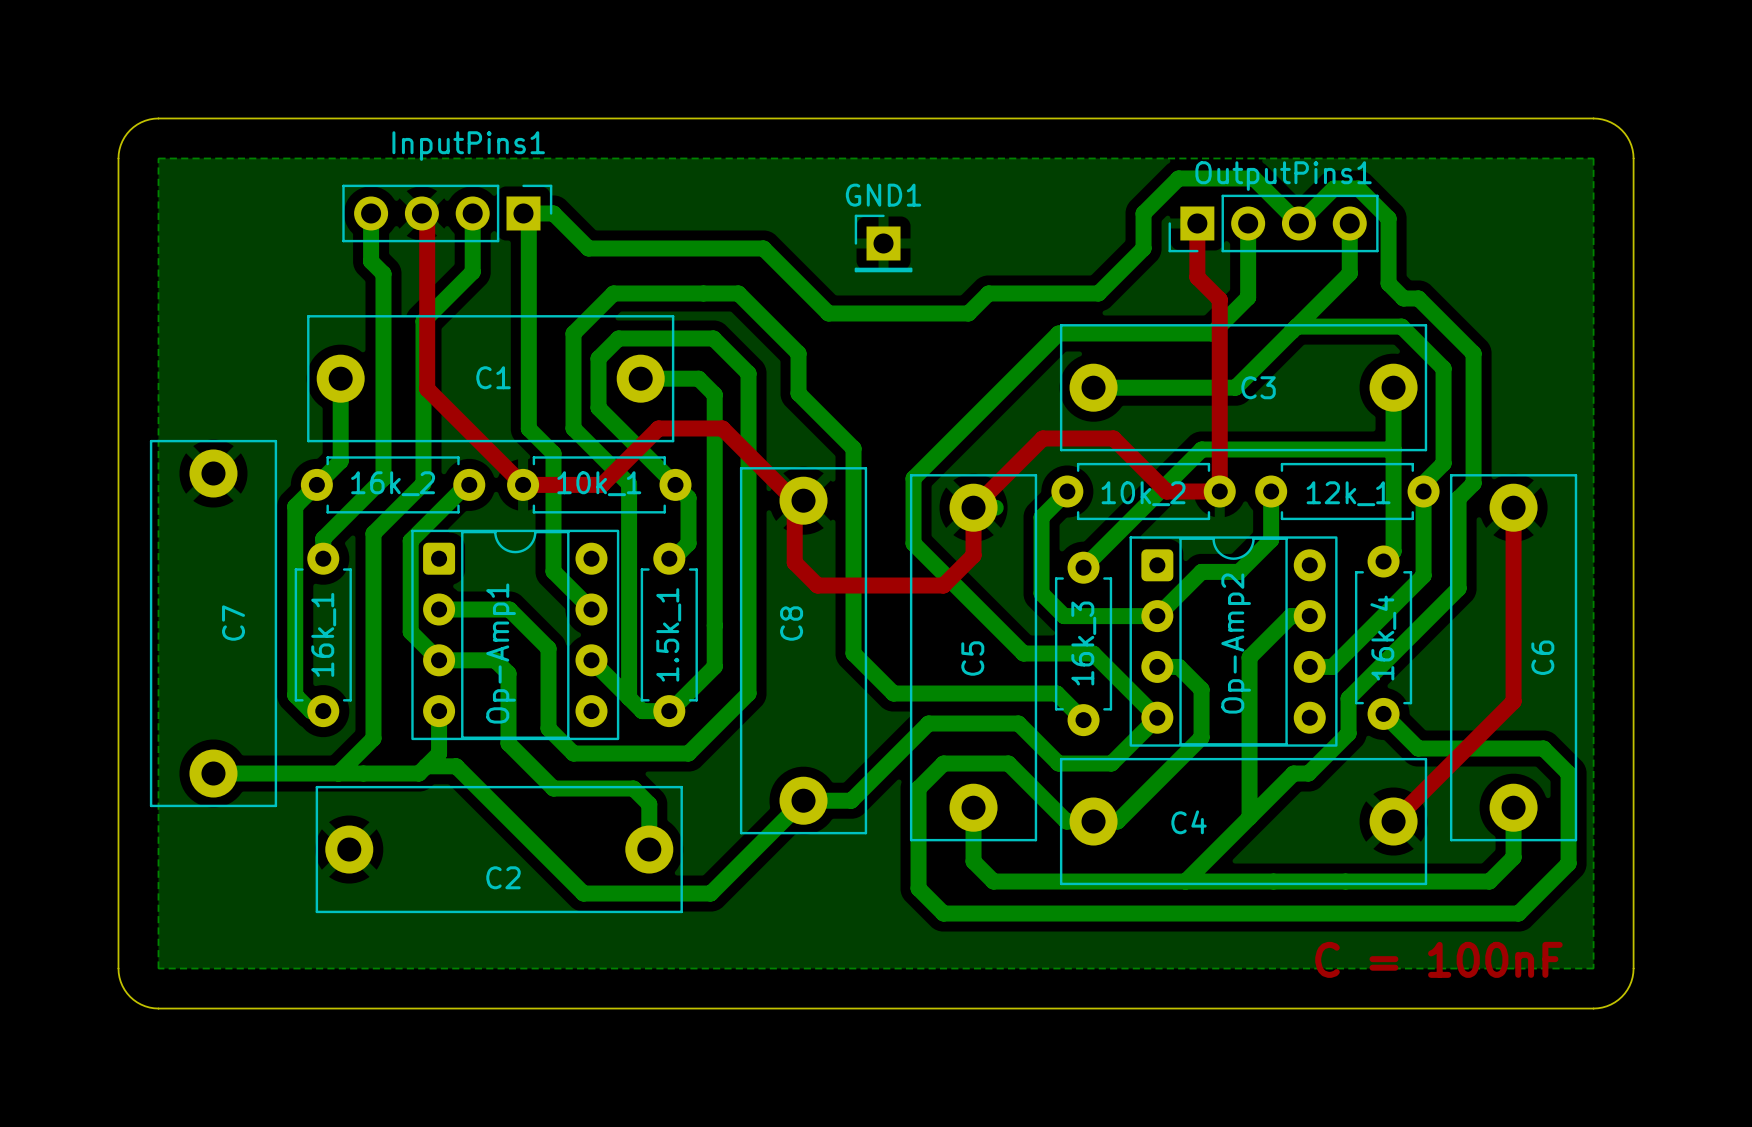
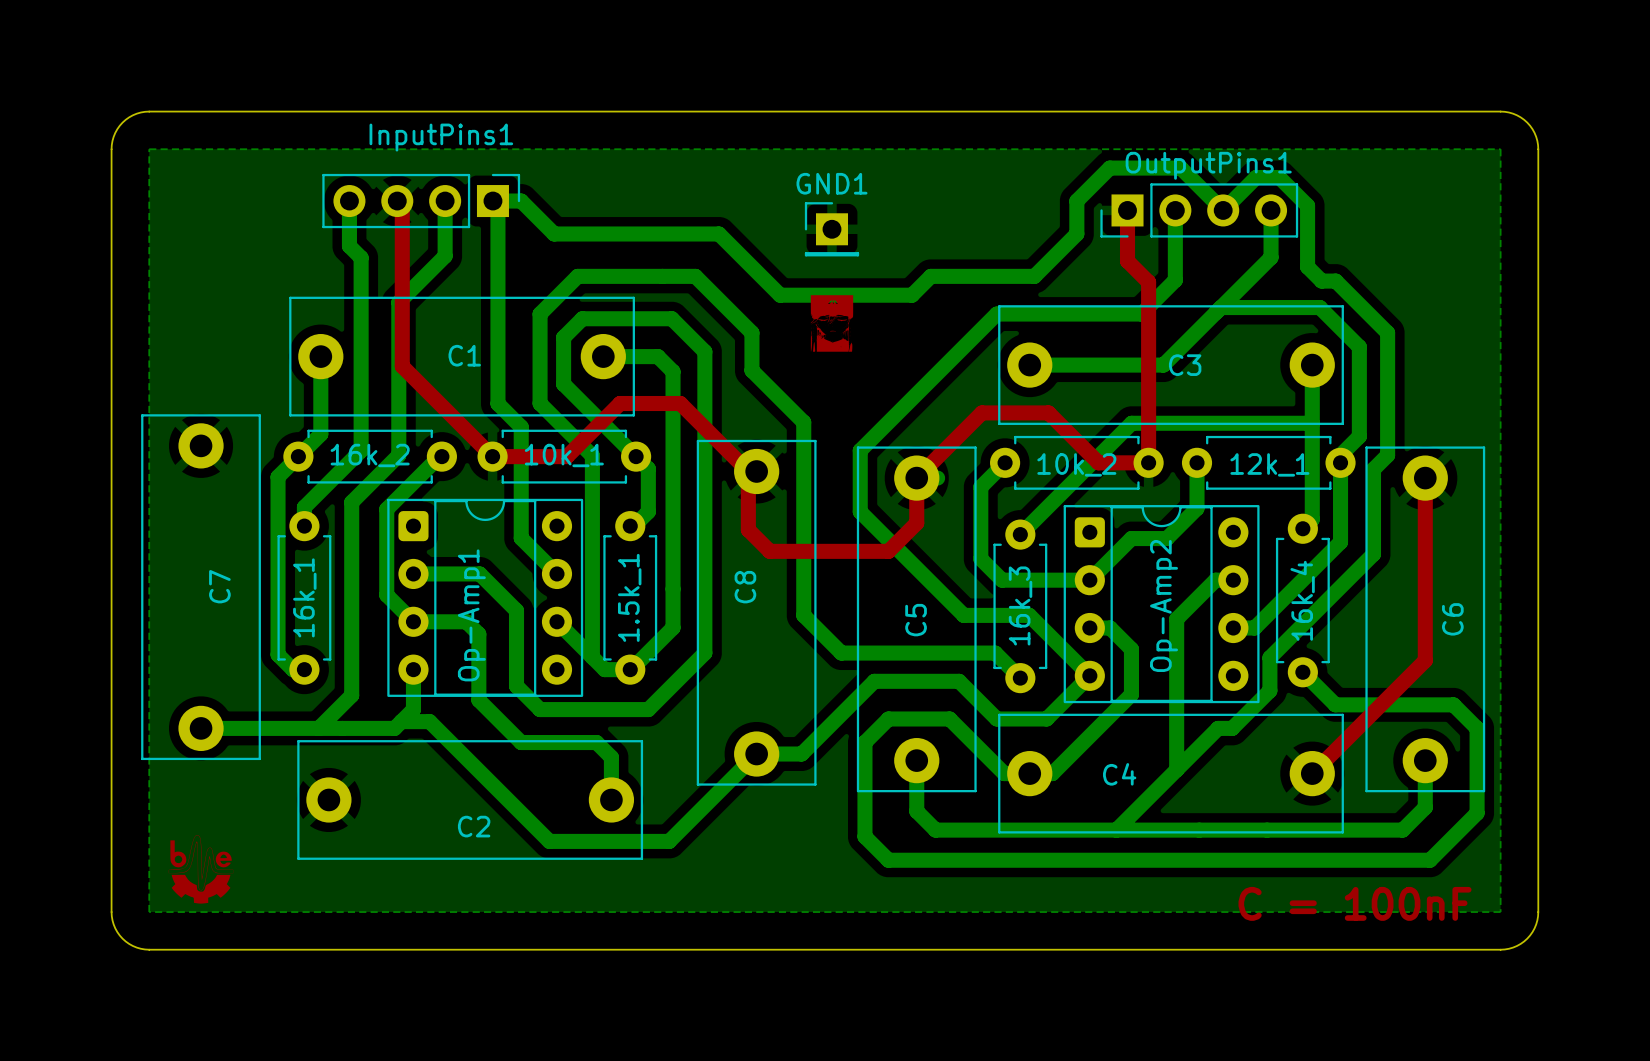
drawing: none -> [810, 295, 854, 352]
drawing: none -> [168, 834, 234, 904]

